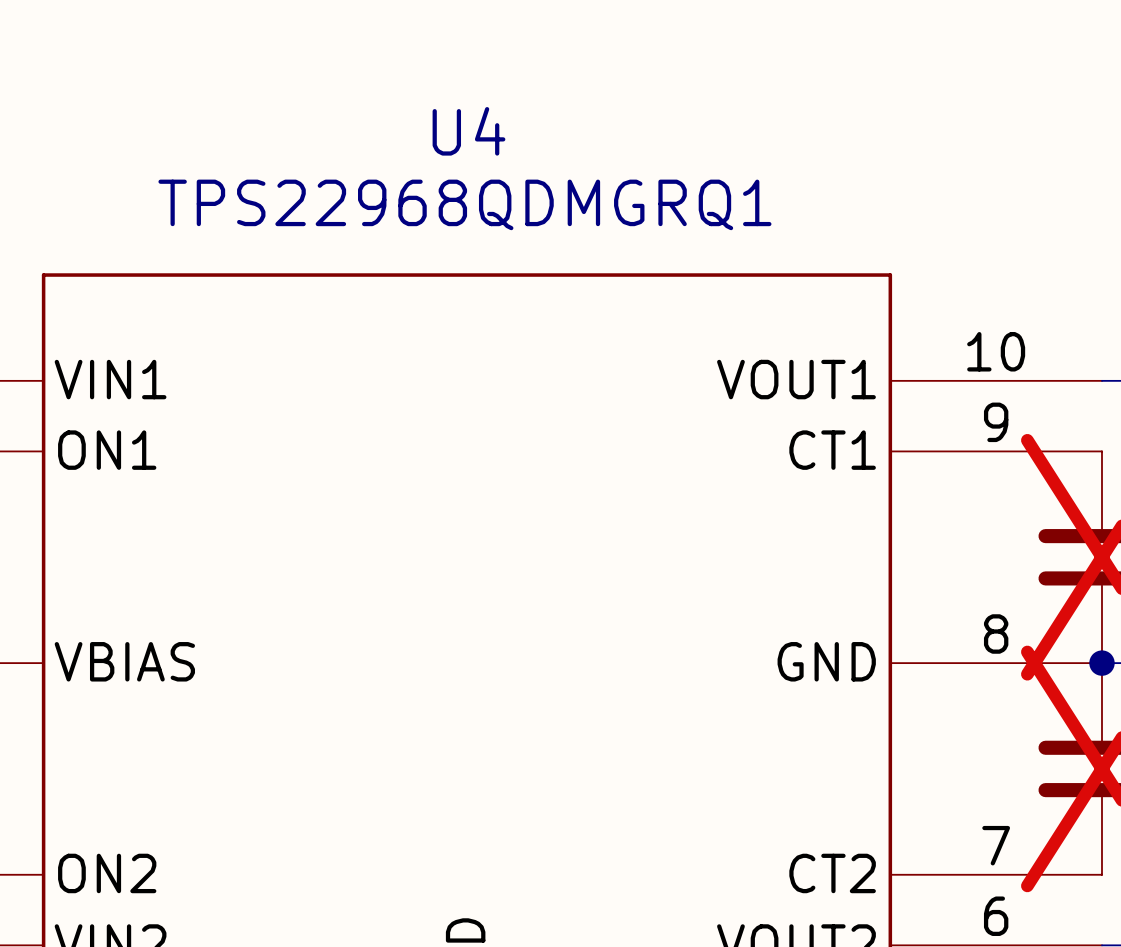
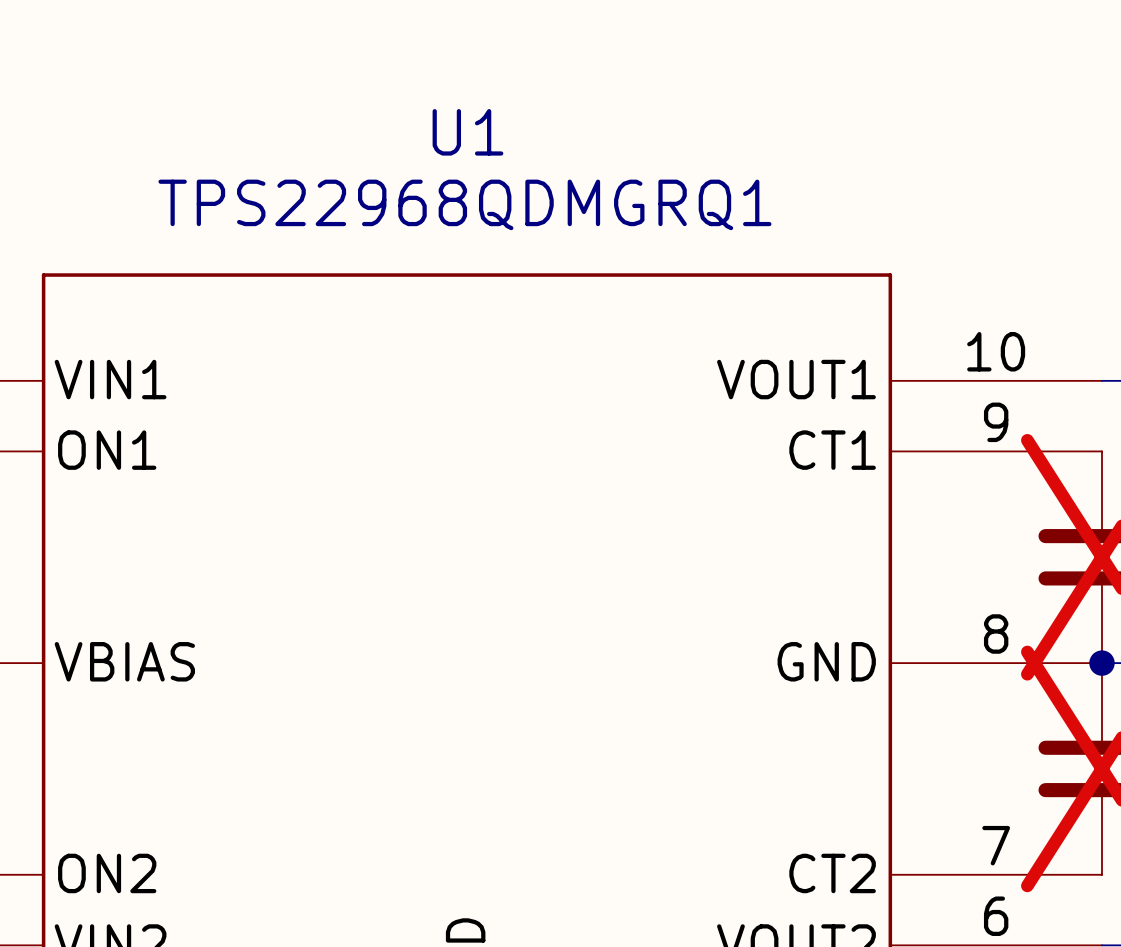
U4 name: U4 (468, 131) -> U1 (467, 132)

